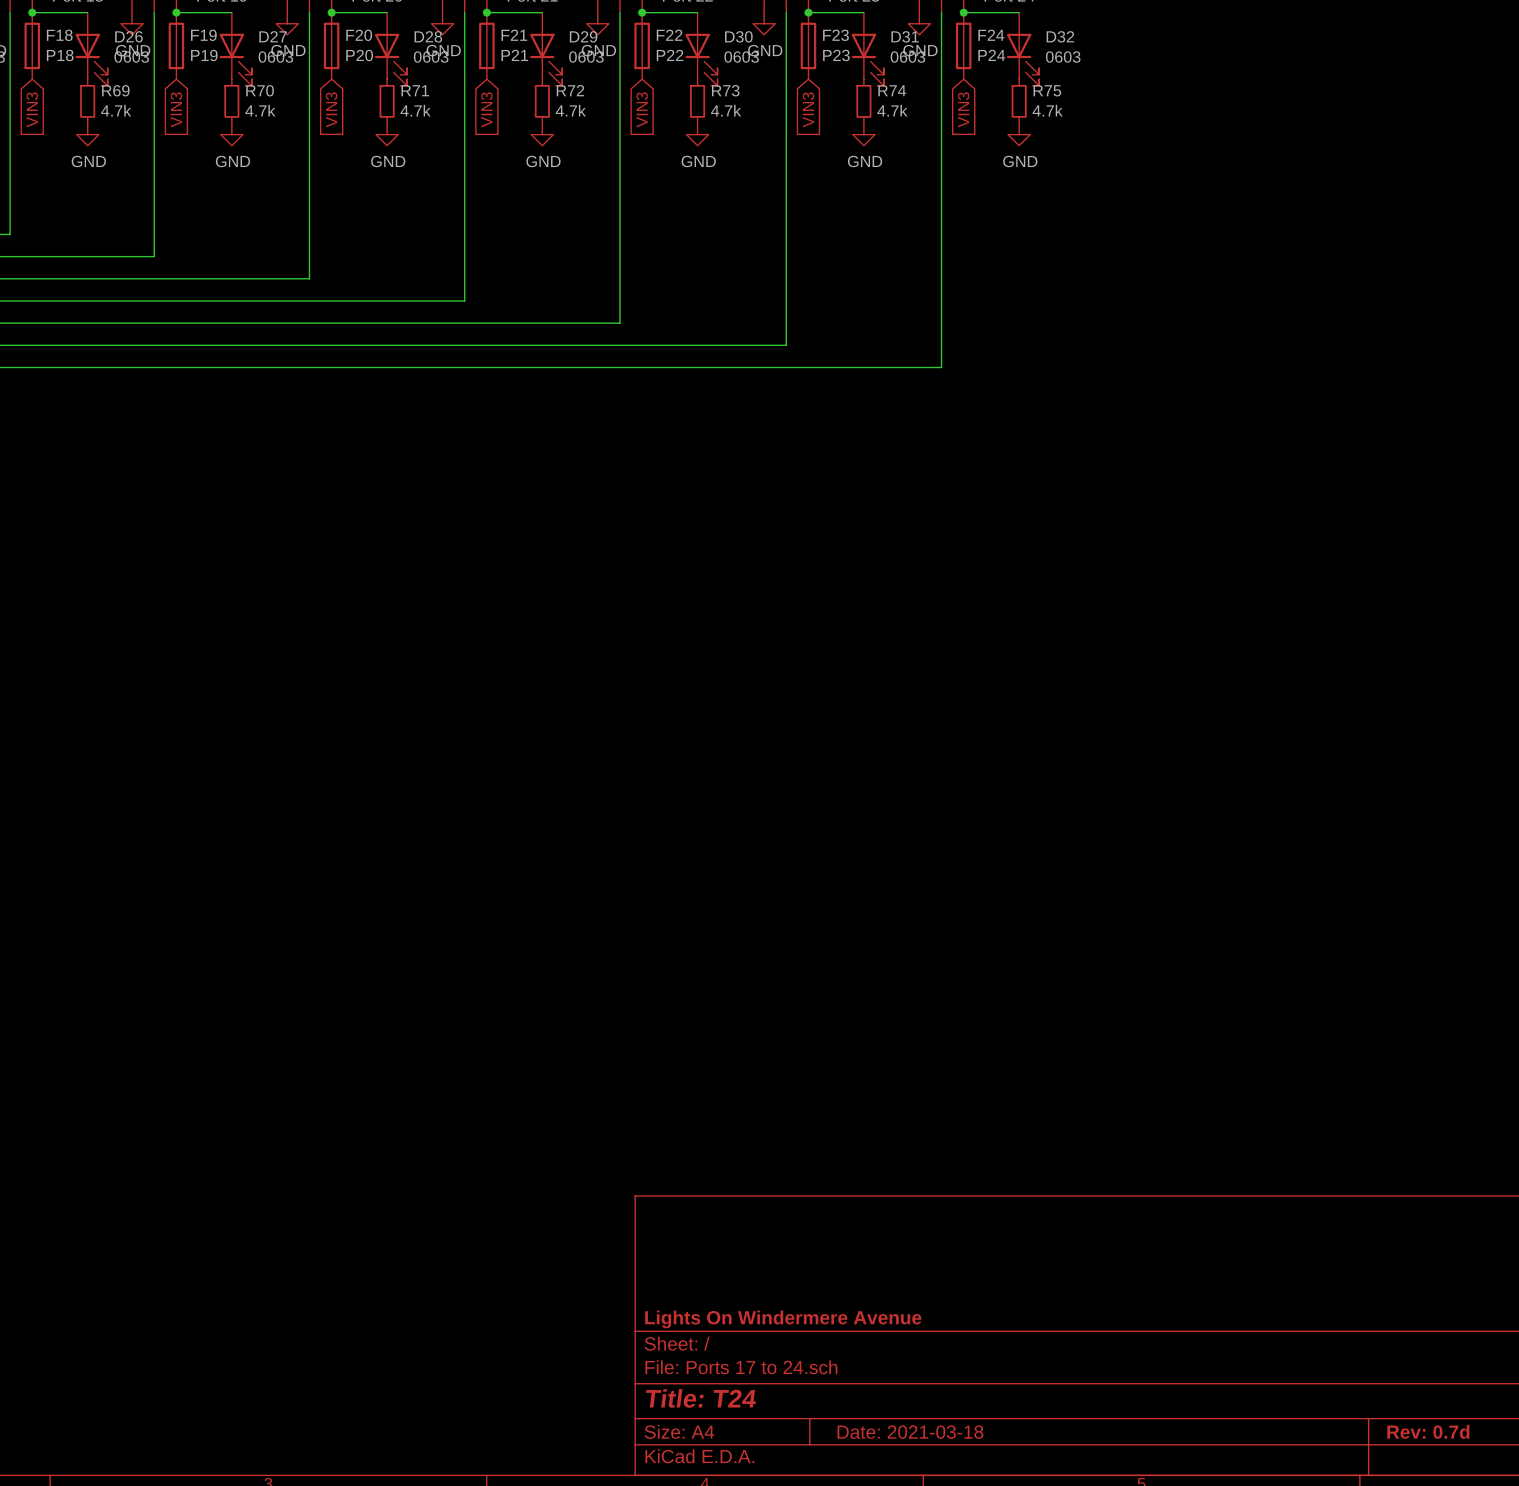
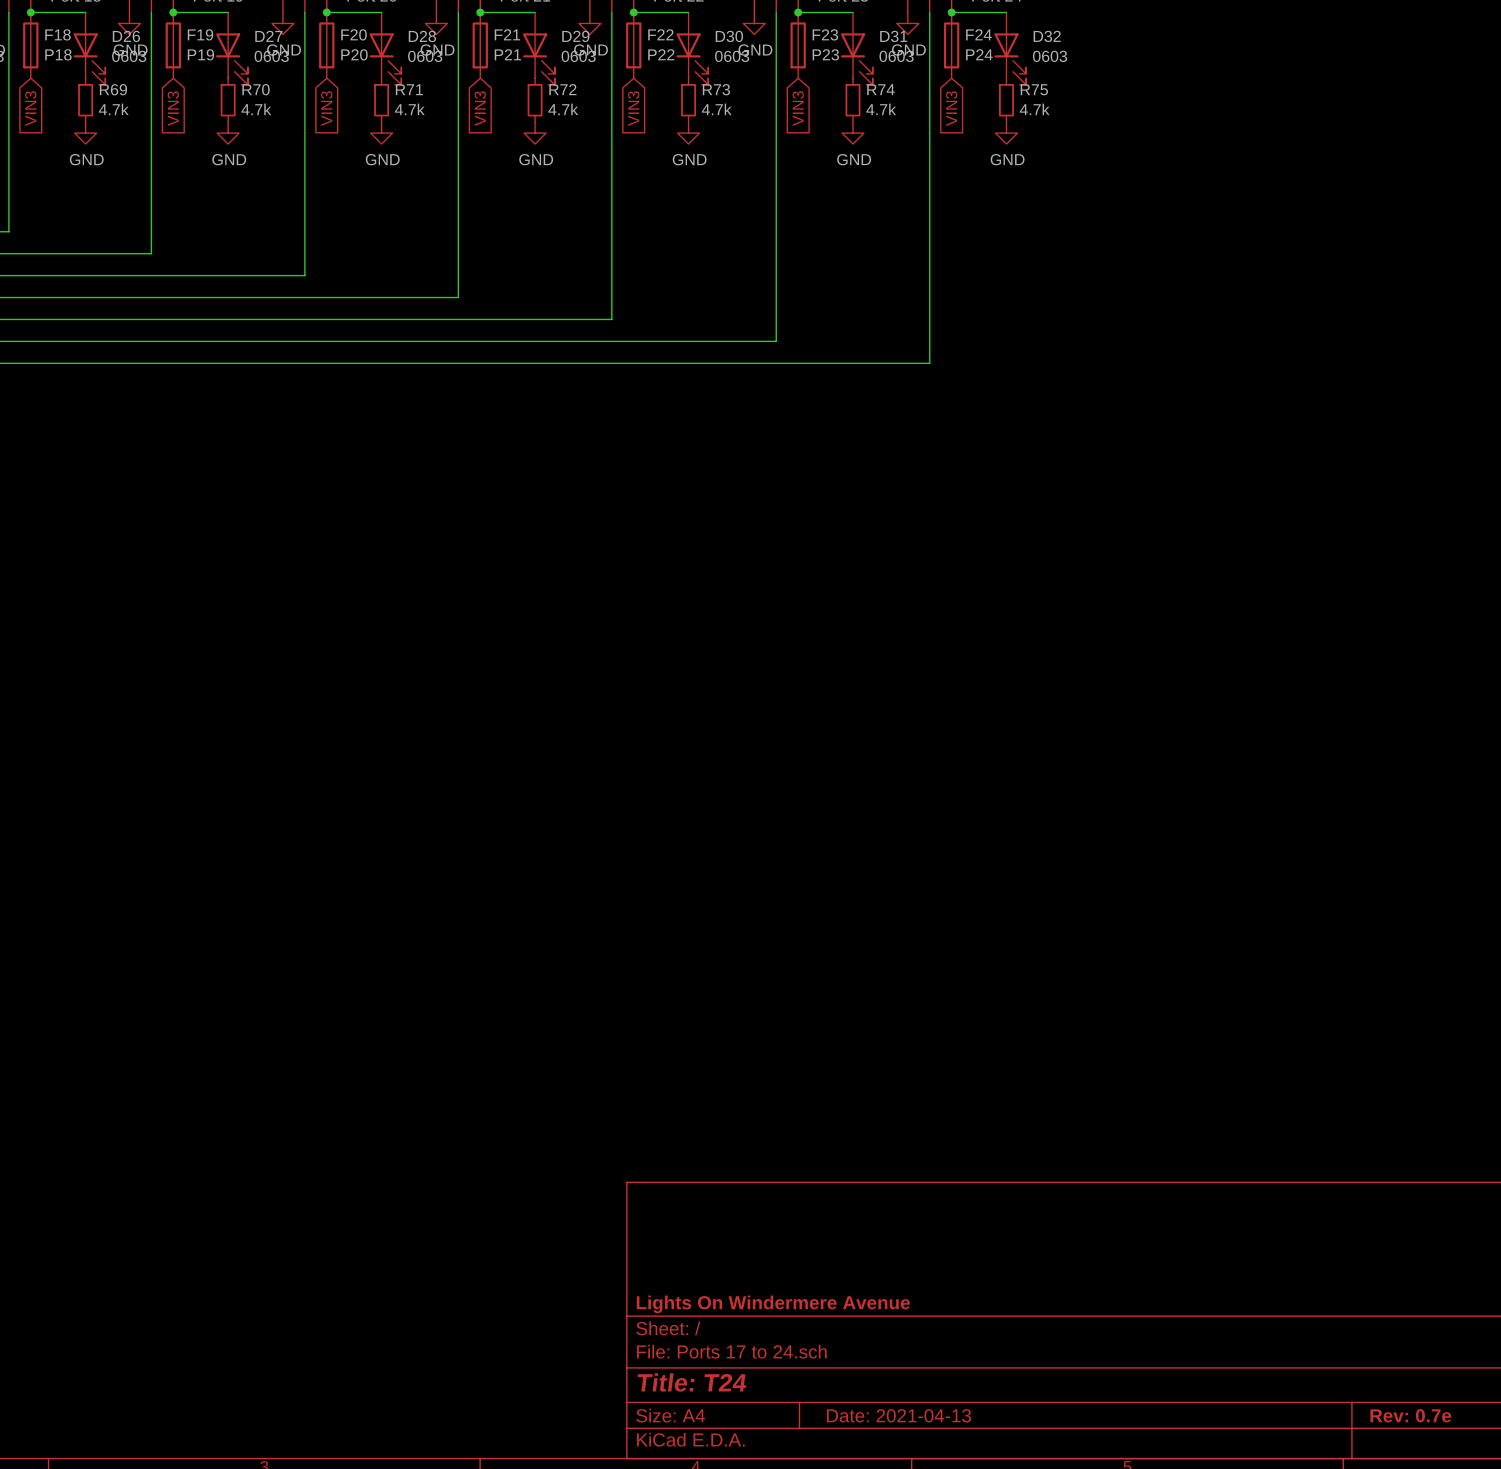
title block: Rev: 0.7d (1428, 1431) -> Rev: 0.7e (1410, 1415)
title block: Date: 2021-03-18 (910, 1432) -> Date: 2021-04-13 (898, 1415)

